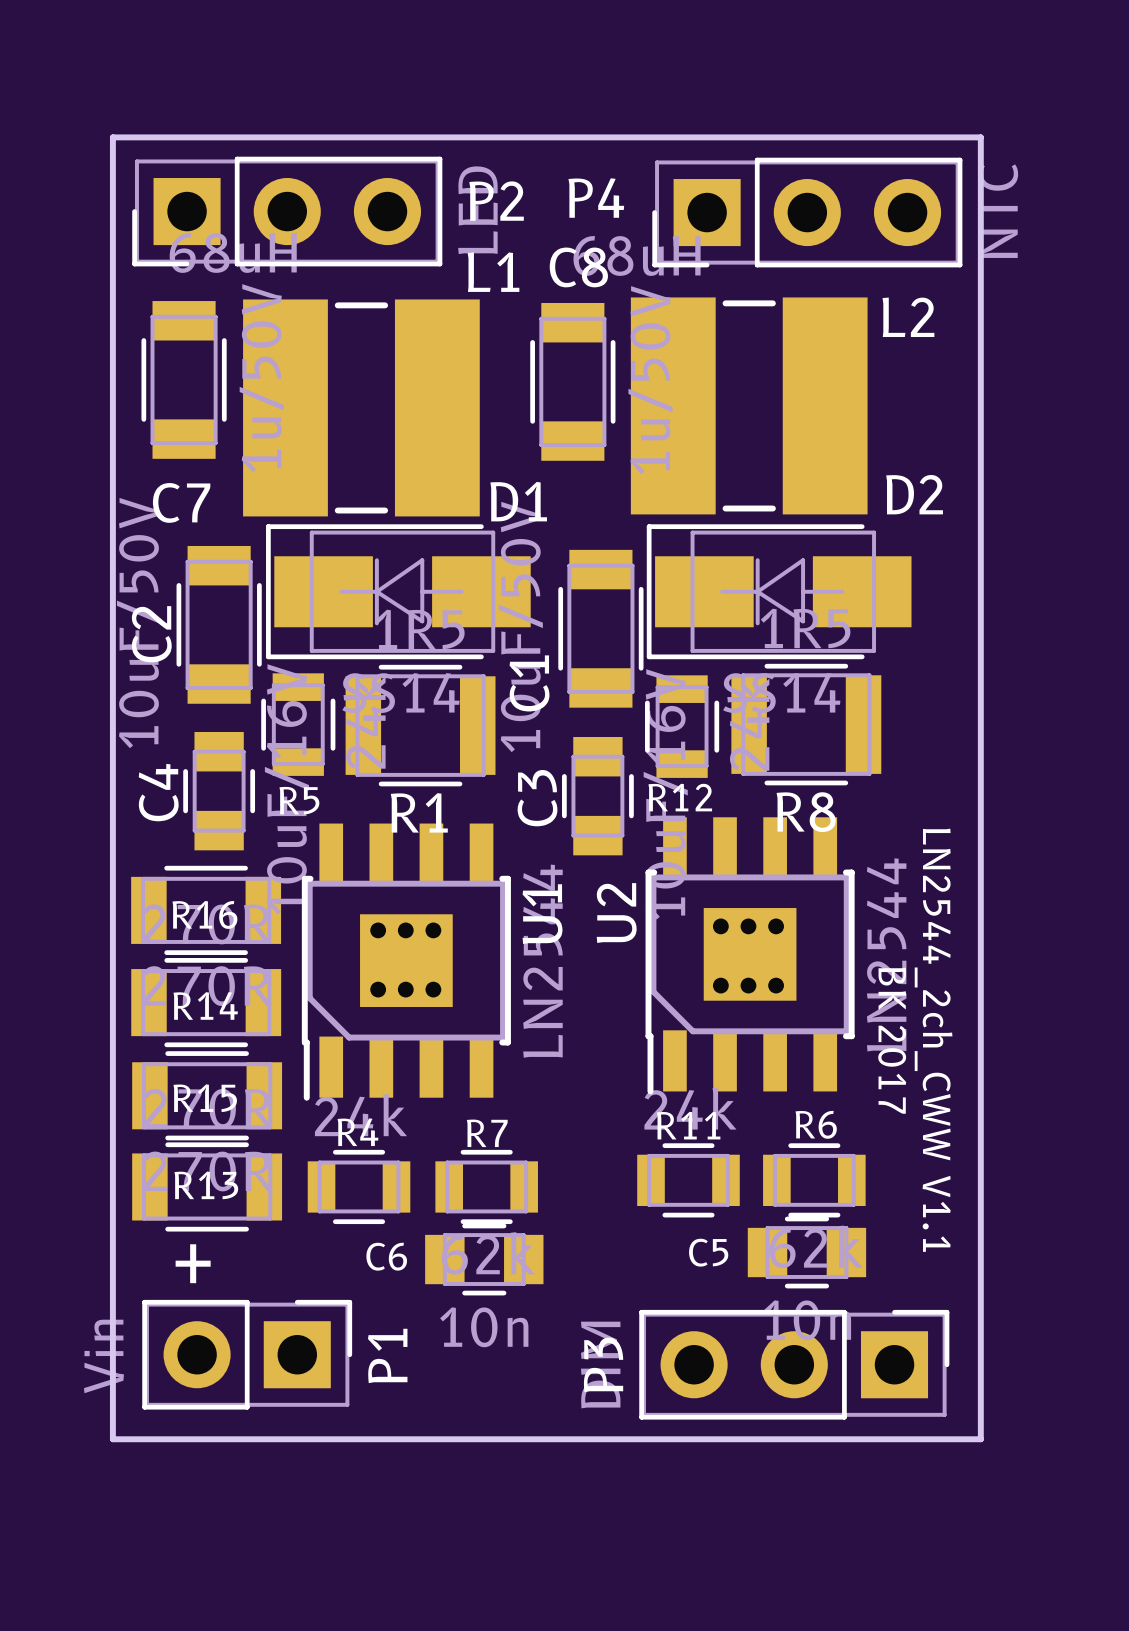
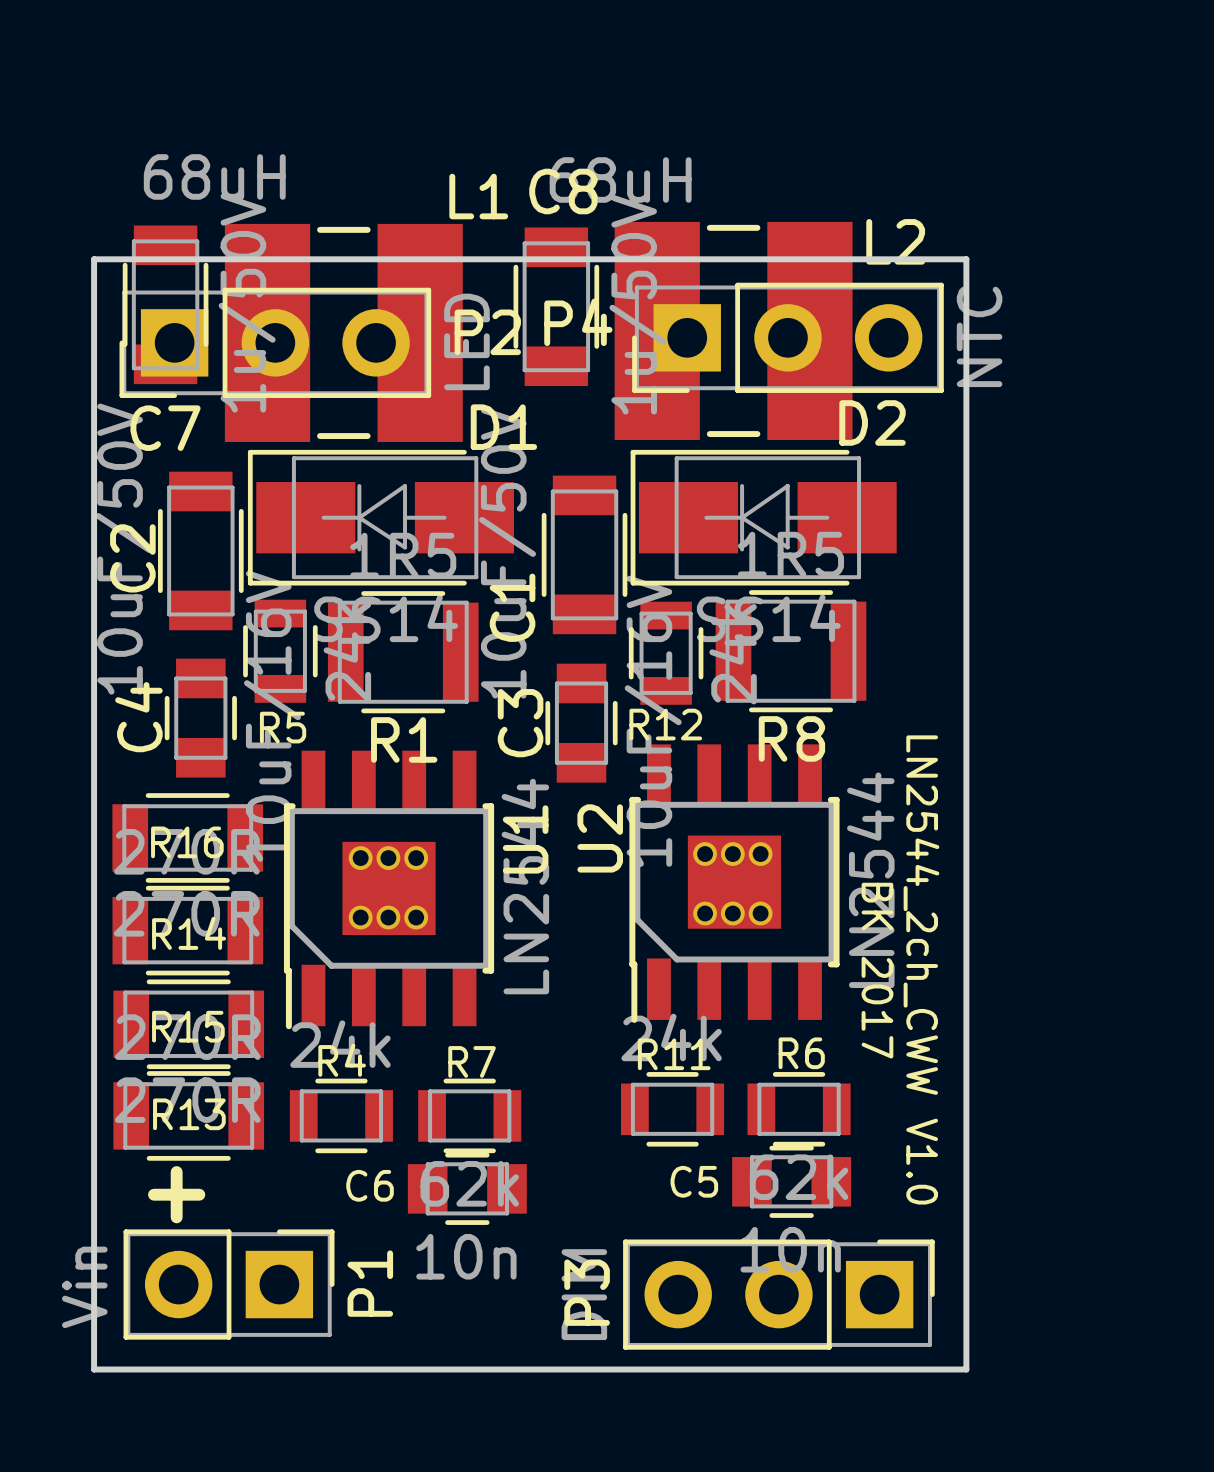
P2 position: (287, 211) -> (275, 342)
P4 position: (807, 212) -> (787, 337)
board edge: (112, 334) (112, 137) (980, 137) (980, 334) -> (94, 259) (966, 259)
D2 name position: D2 (914, 494) -> D2 (872, 422)
text: LN2544_2ch_CWW V1.1 (933, 1040) -> LN2544_2ch_CWW V1.0 (921, 969)

